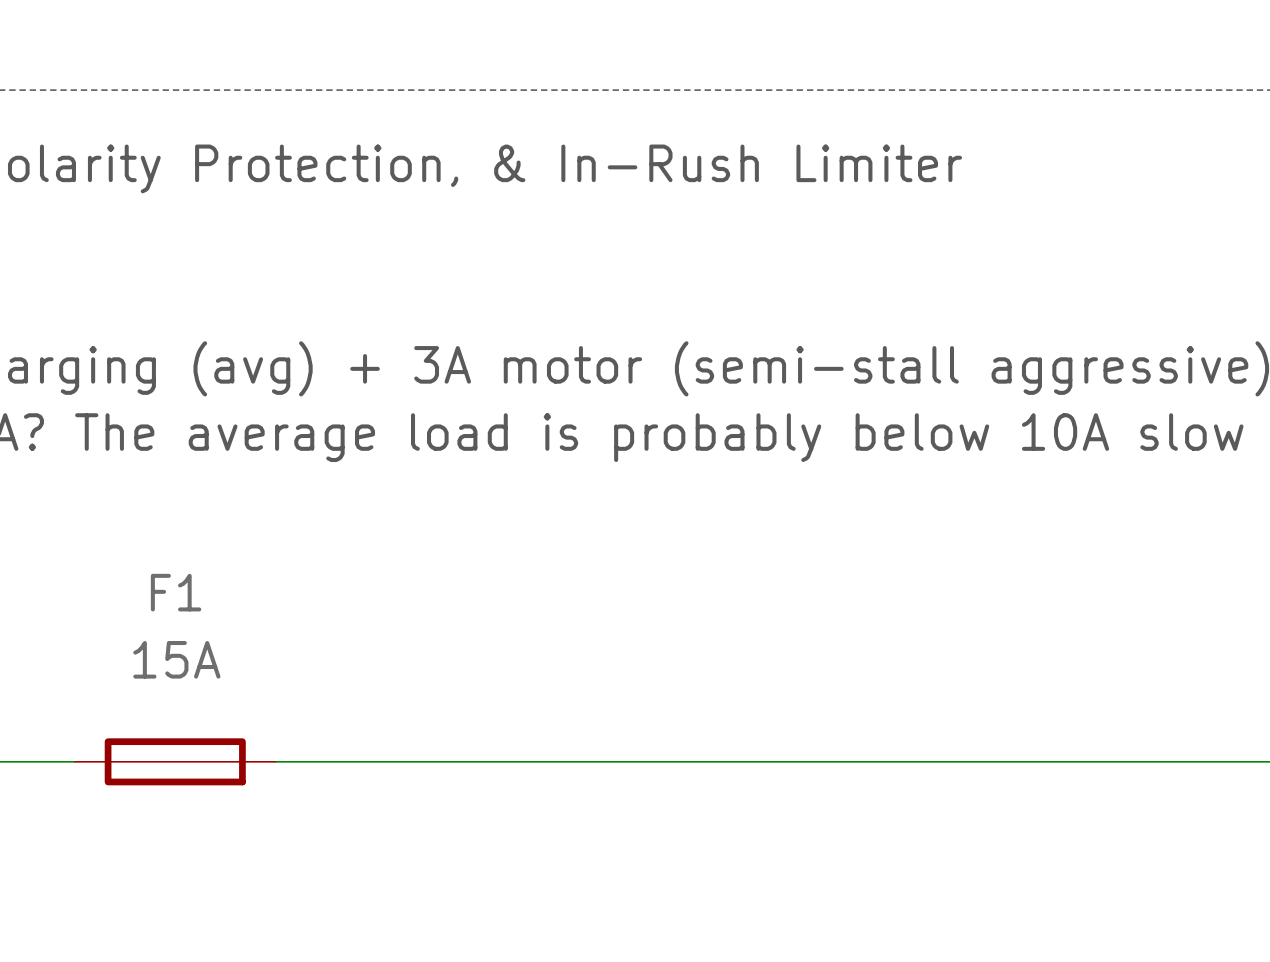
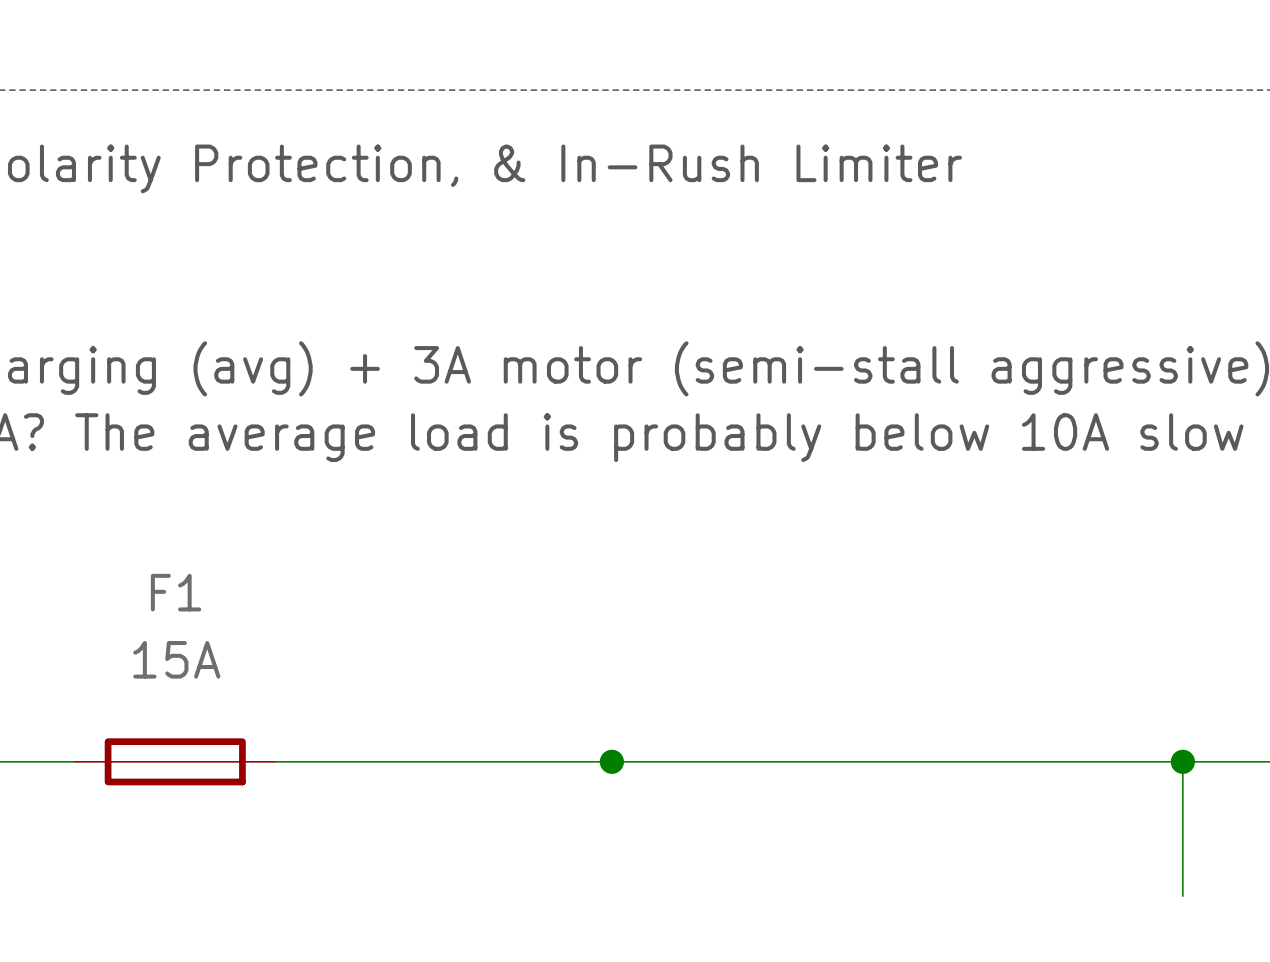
junction: none -> (611, 761)
wire: none -> (1182, 761) (1182, 896)
junction: none -> (1182, 761)

